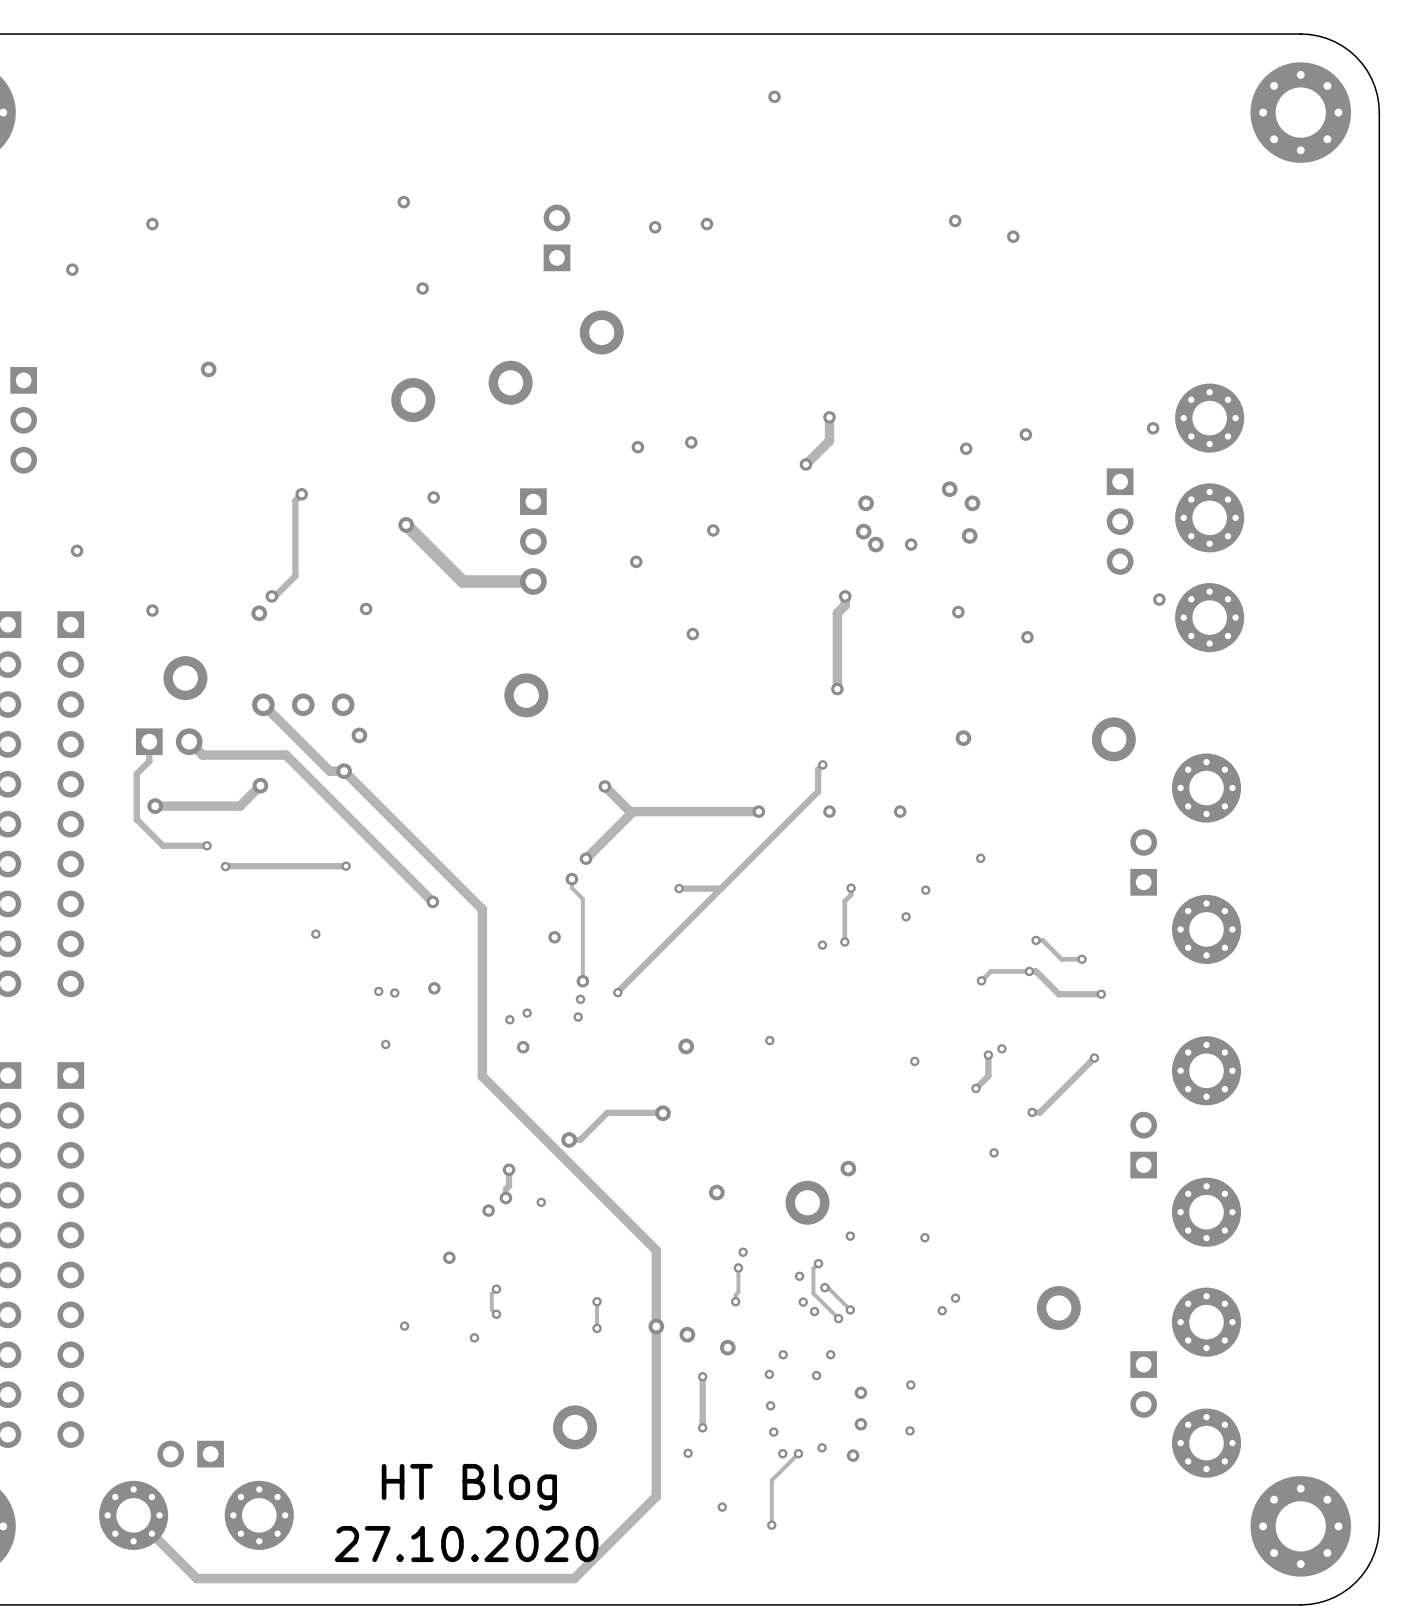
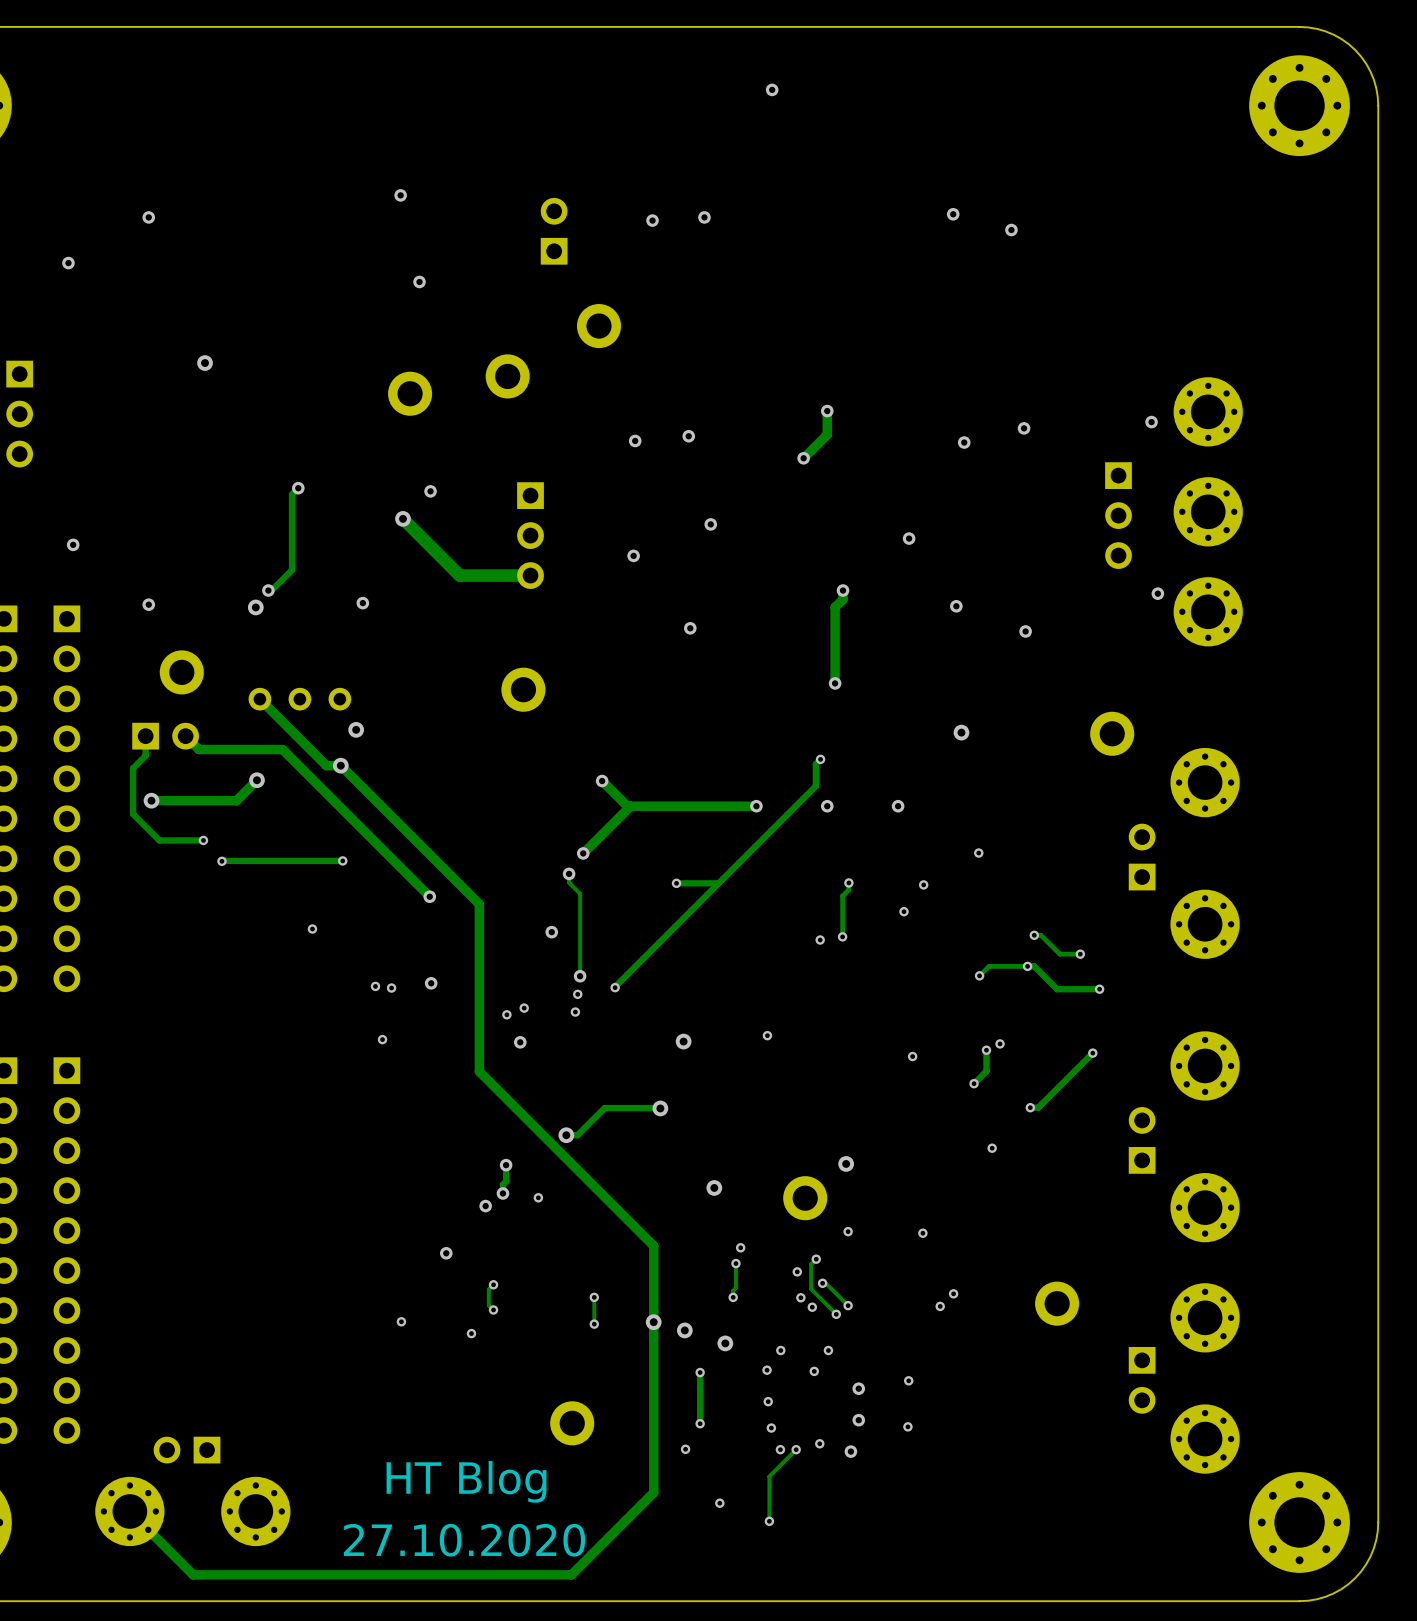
via: (949, 489) -> none
via: (866, 503) -> none
via: (972, 503) -> none
via: (863, 531) -> none
via: (969, 535) -> none
via: (875, 544) -> none

